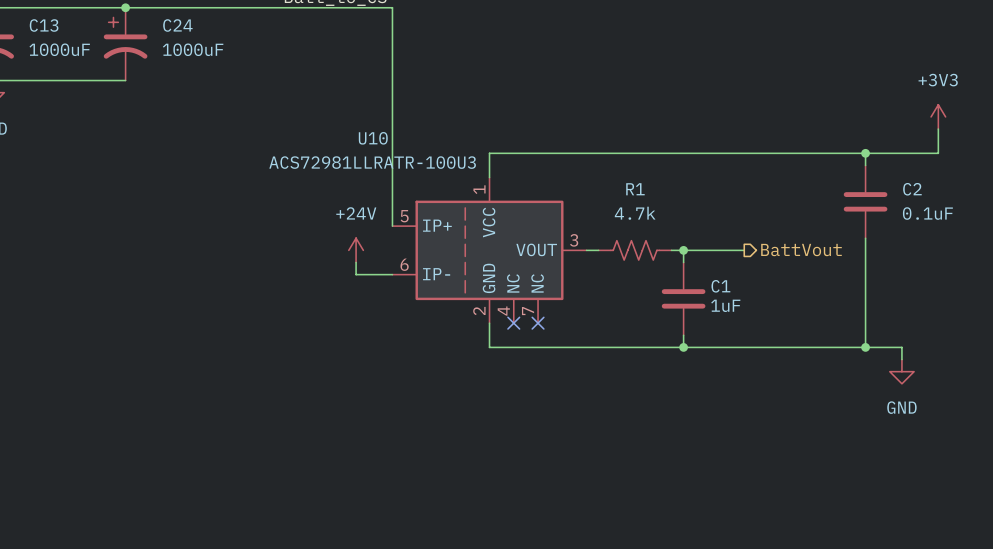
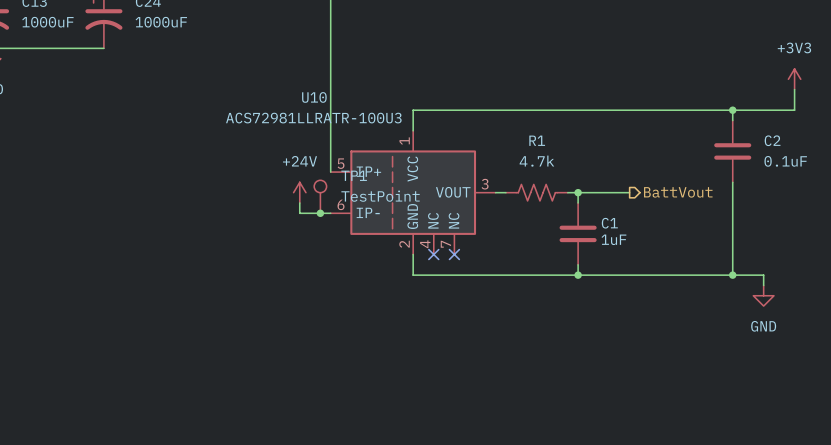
TP1: none -> TestPoint (320, 196)
junction: none -> (320, 213)

